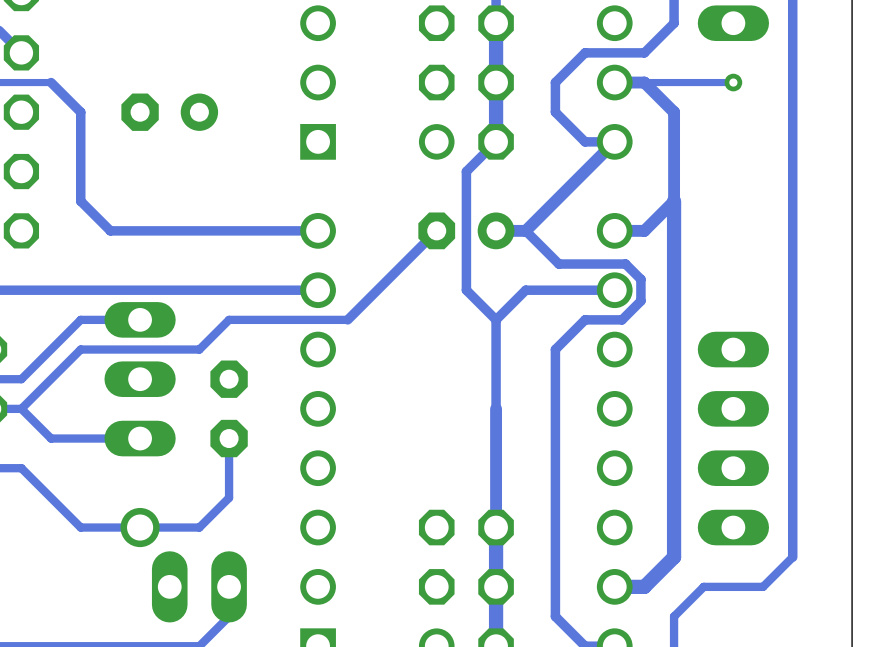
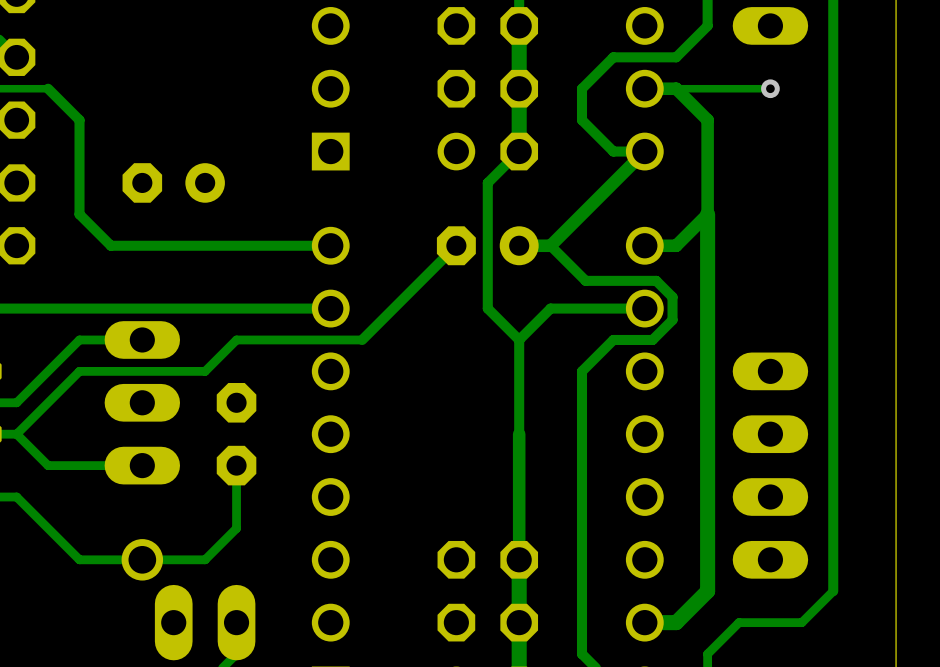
part position: (169, 112) -> (173, 182)

